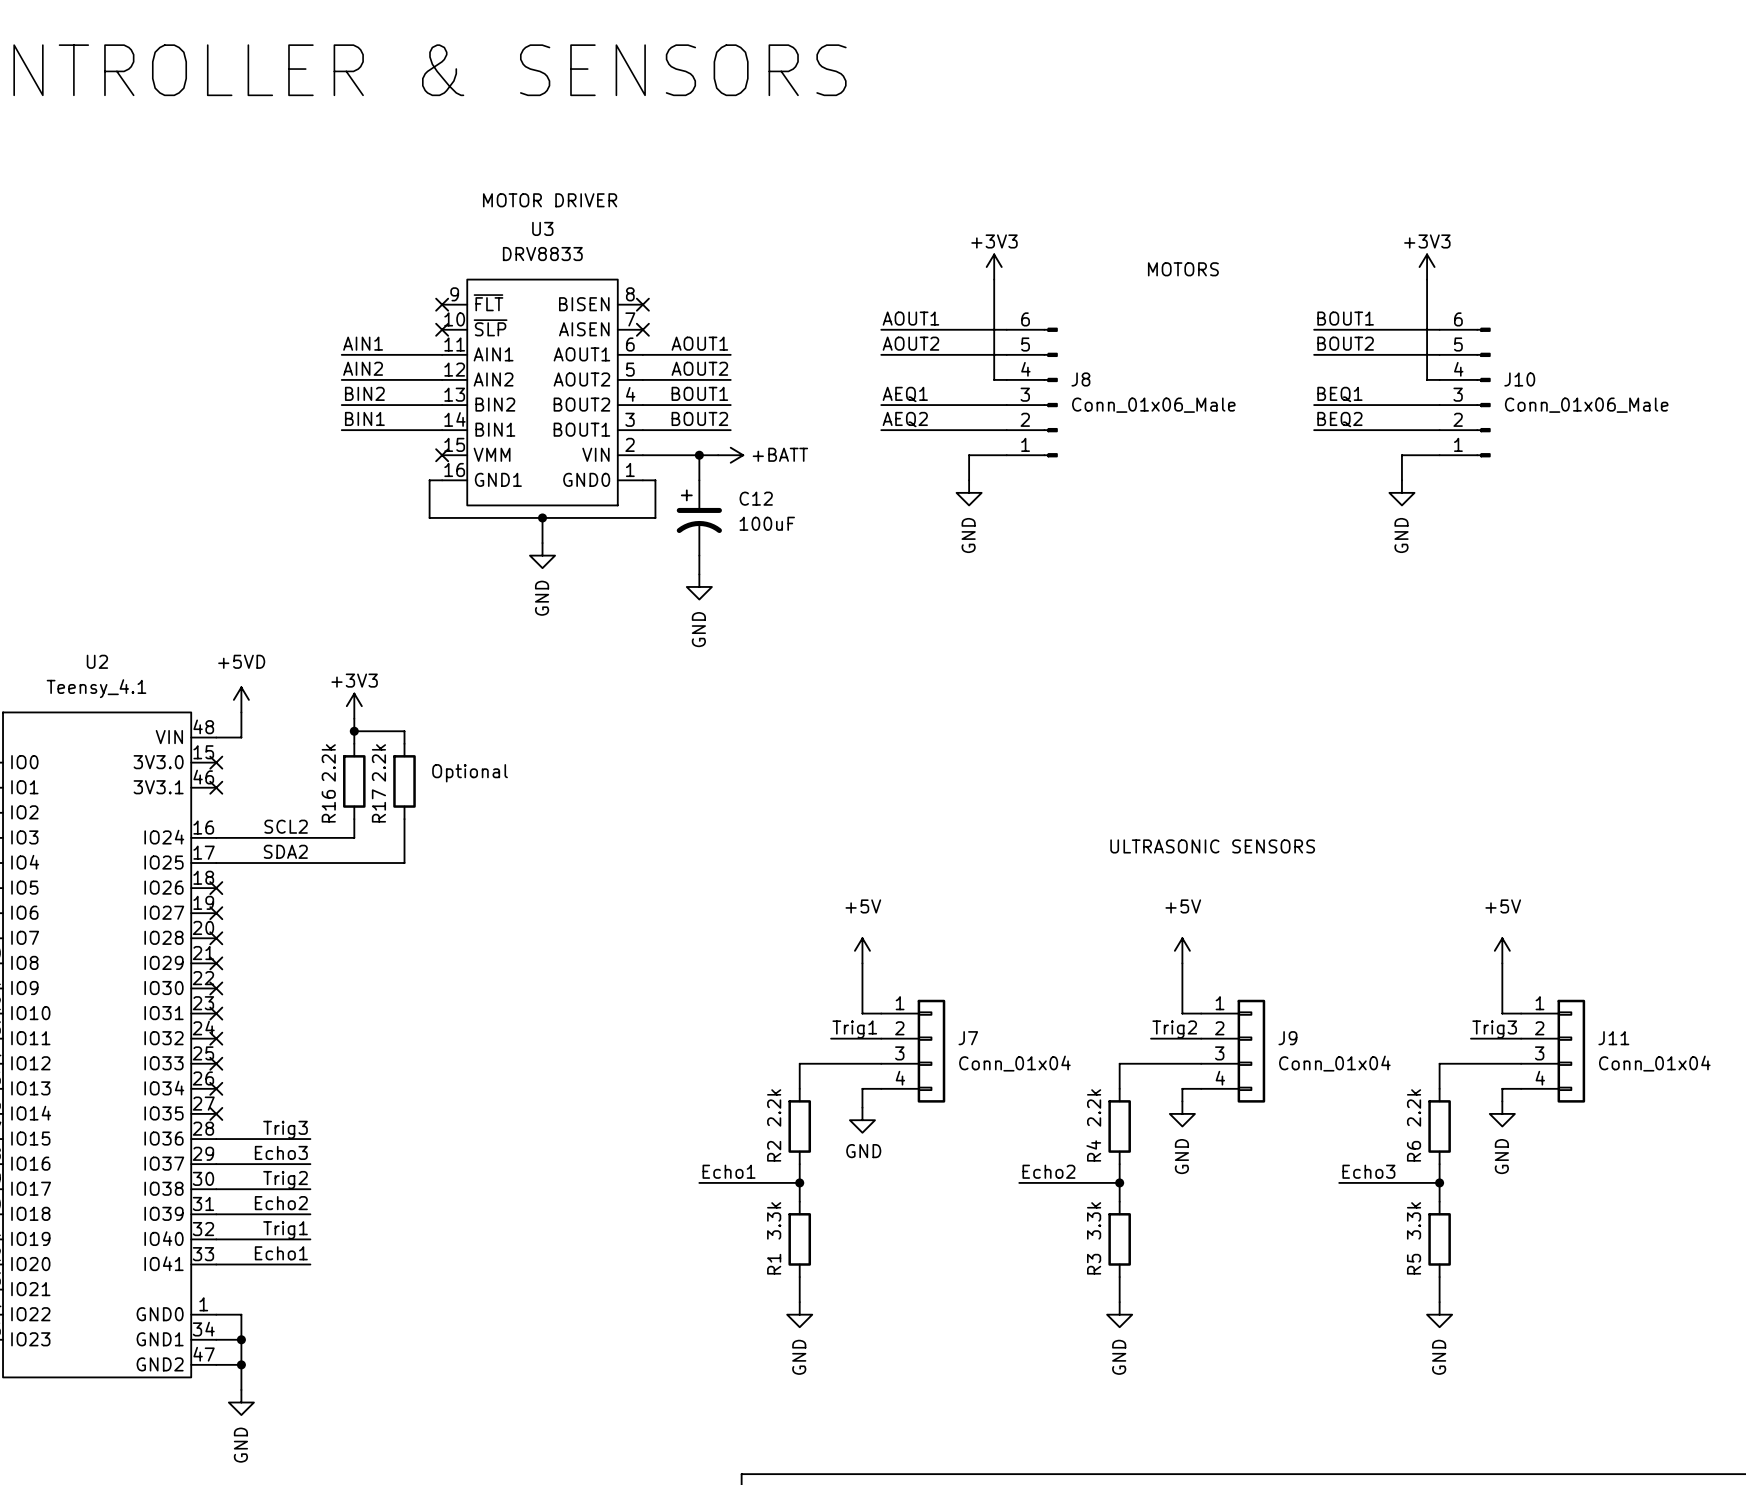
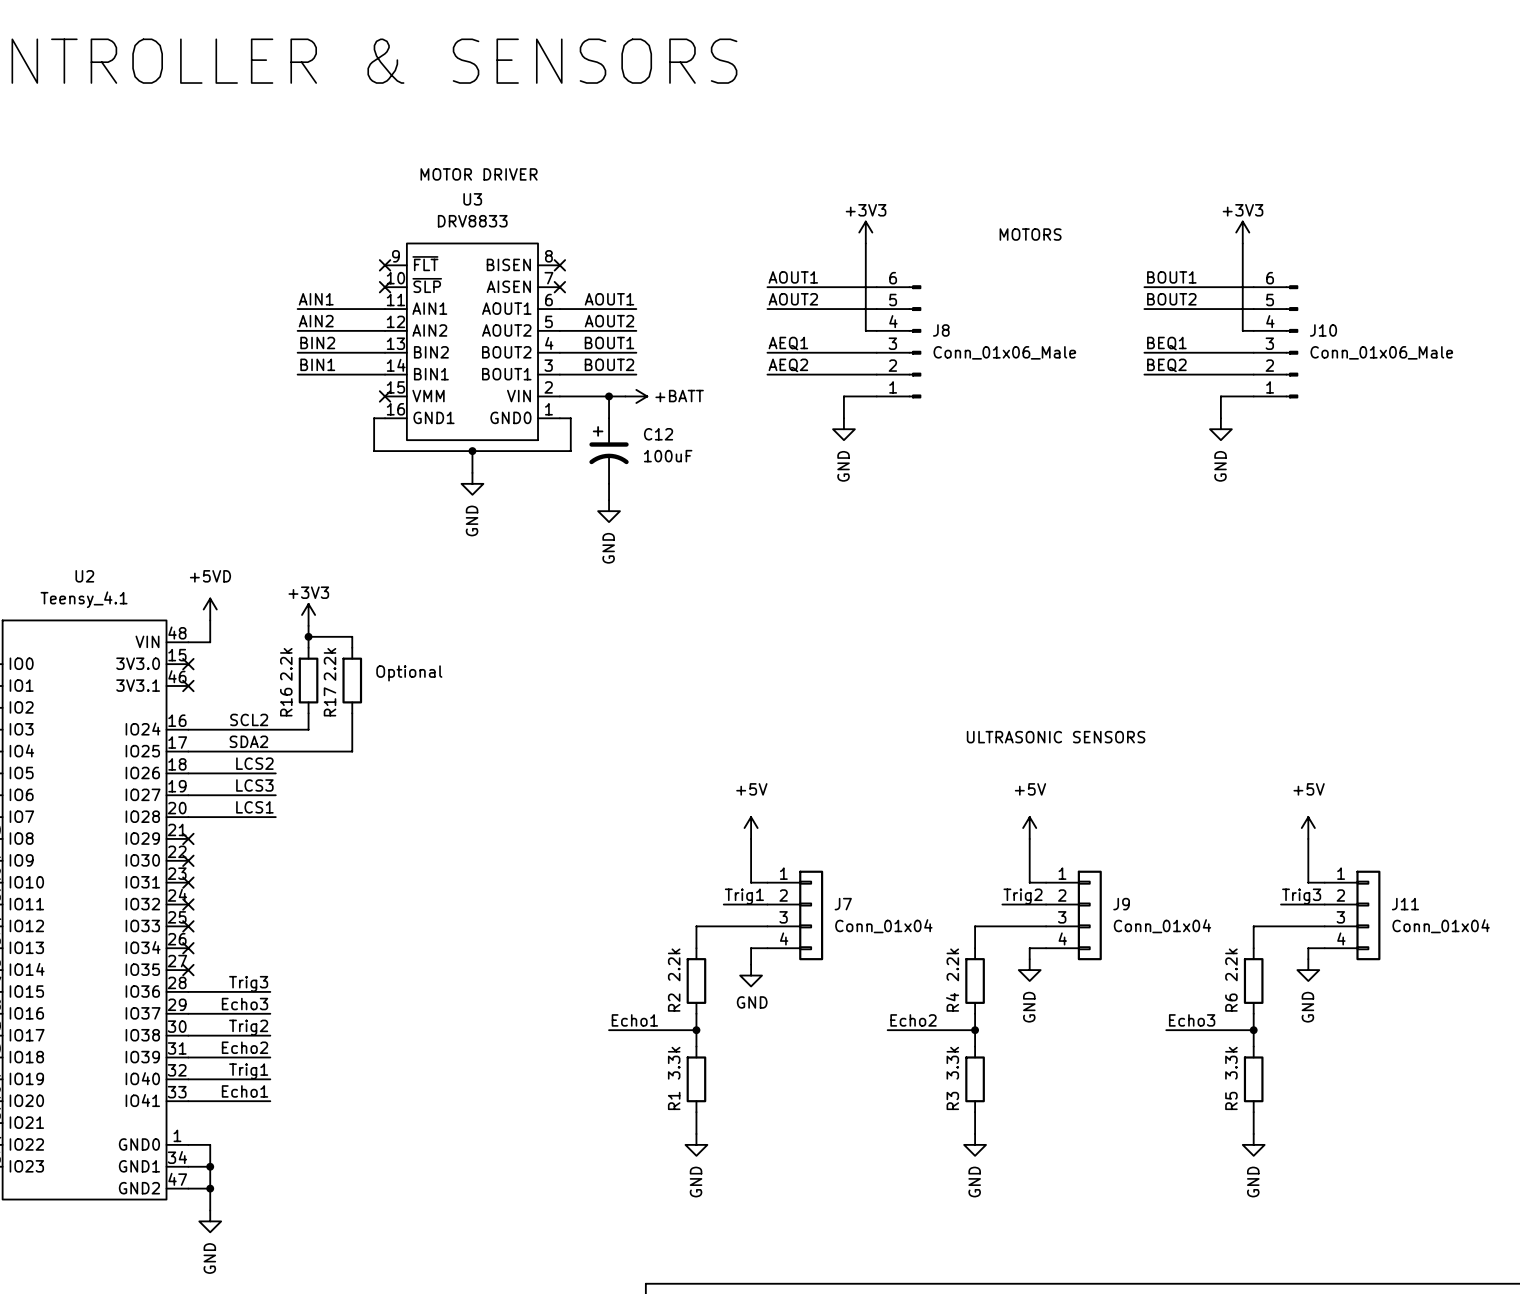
label: none -> LCS2 (254, 763)
wire: none -> (188, 773) (275, 773)
no-connect mark: (216, 888) -> none
label: none -> LCS3 (254, 785)
wire: none -> (188, 795) (275, 795)
no-connect mark: (216, 913) -> none
label: none -> LCS1 (254, 807)
wire: none -> (188, 817) (275, 817)
no-connect mark: (216, 938) -> none

